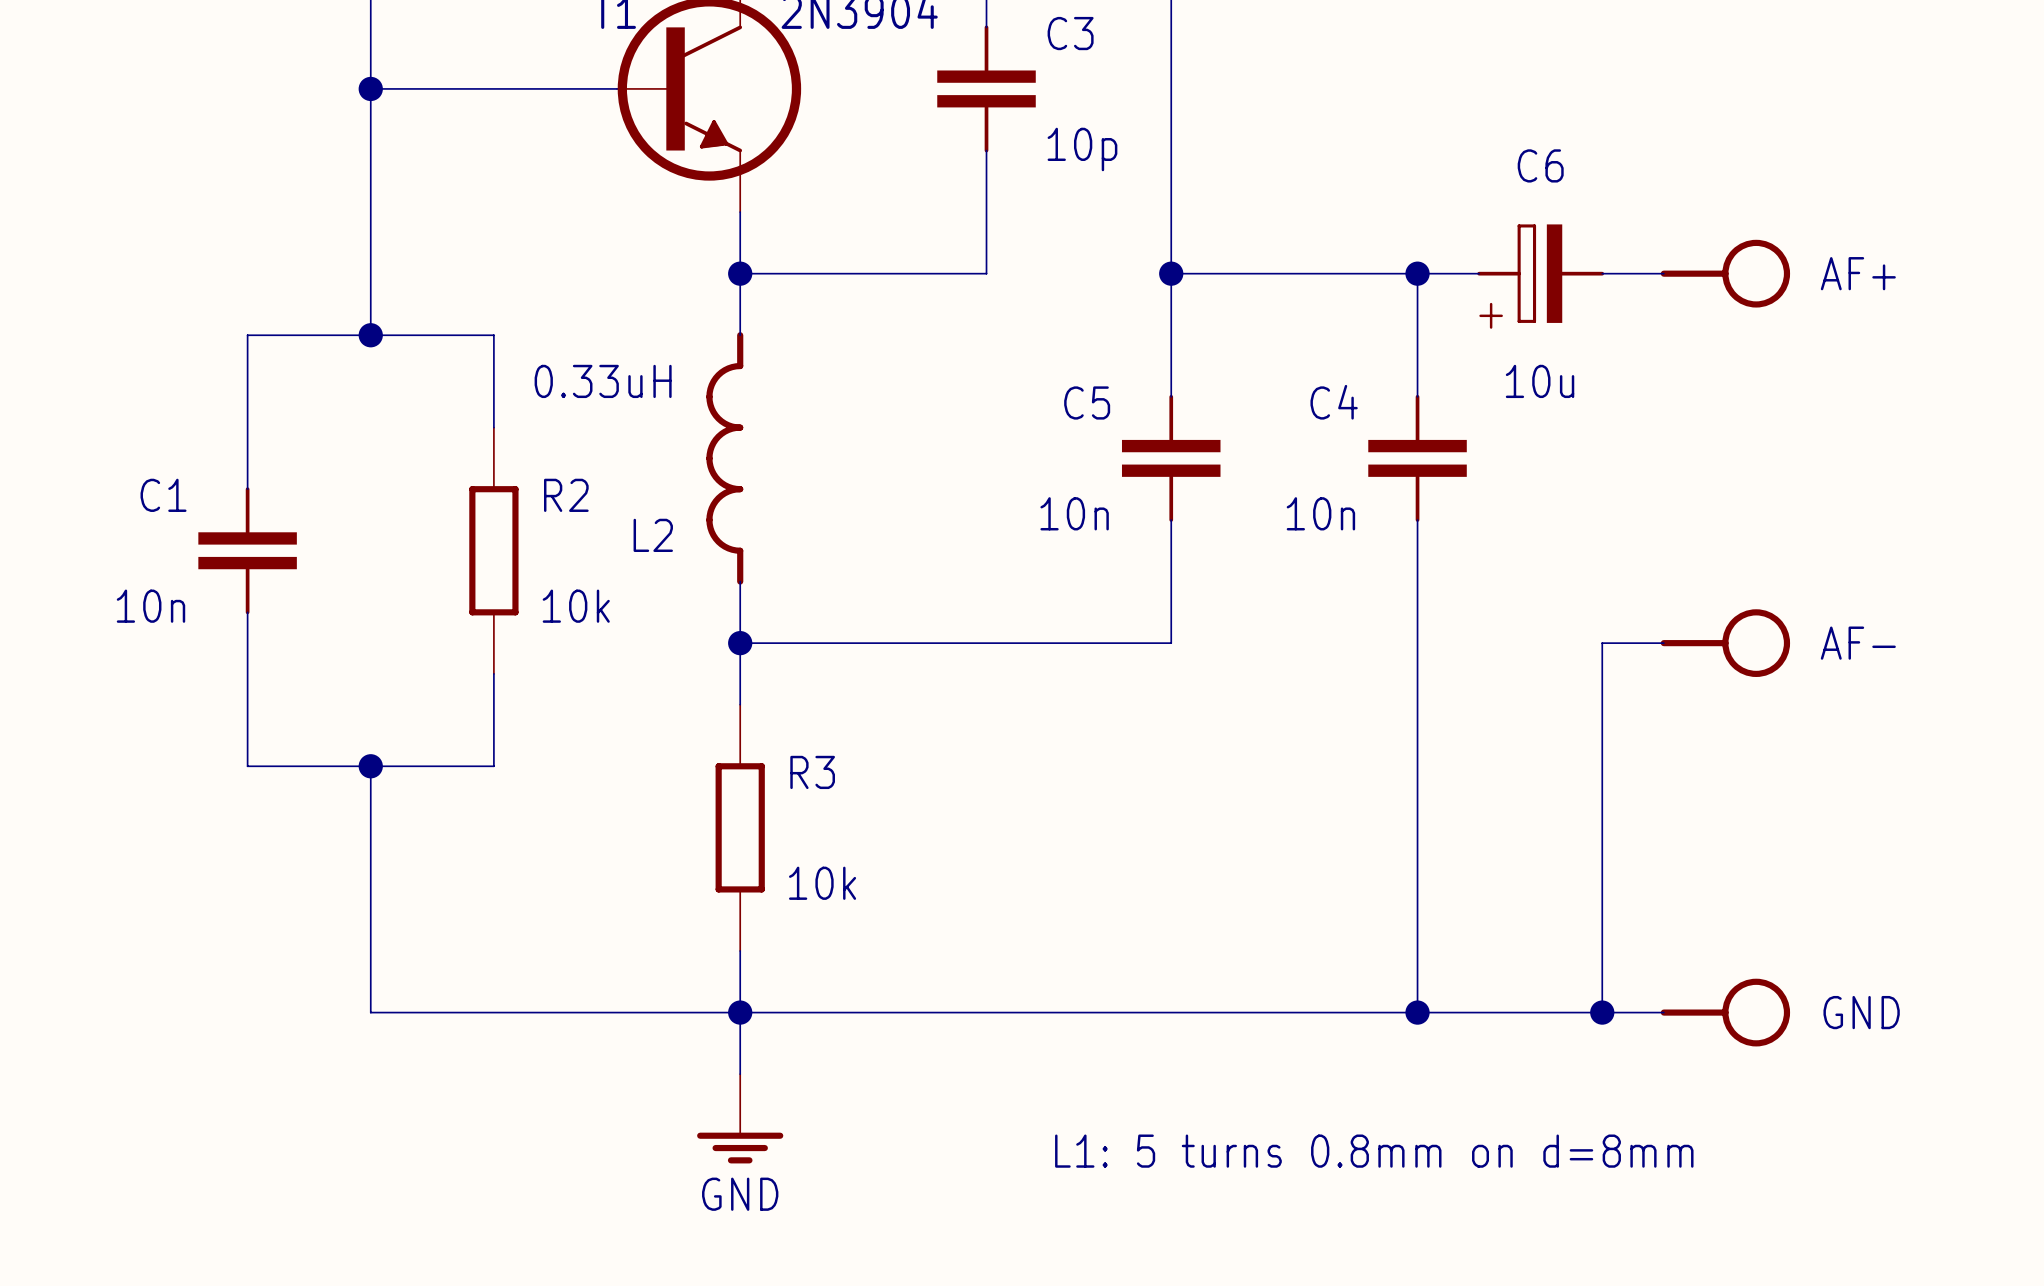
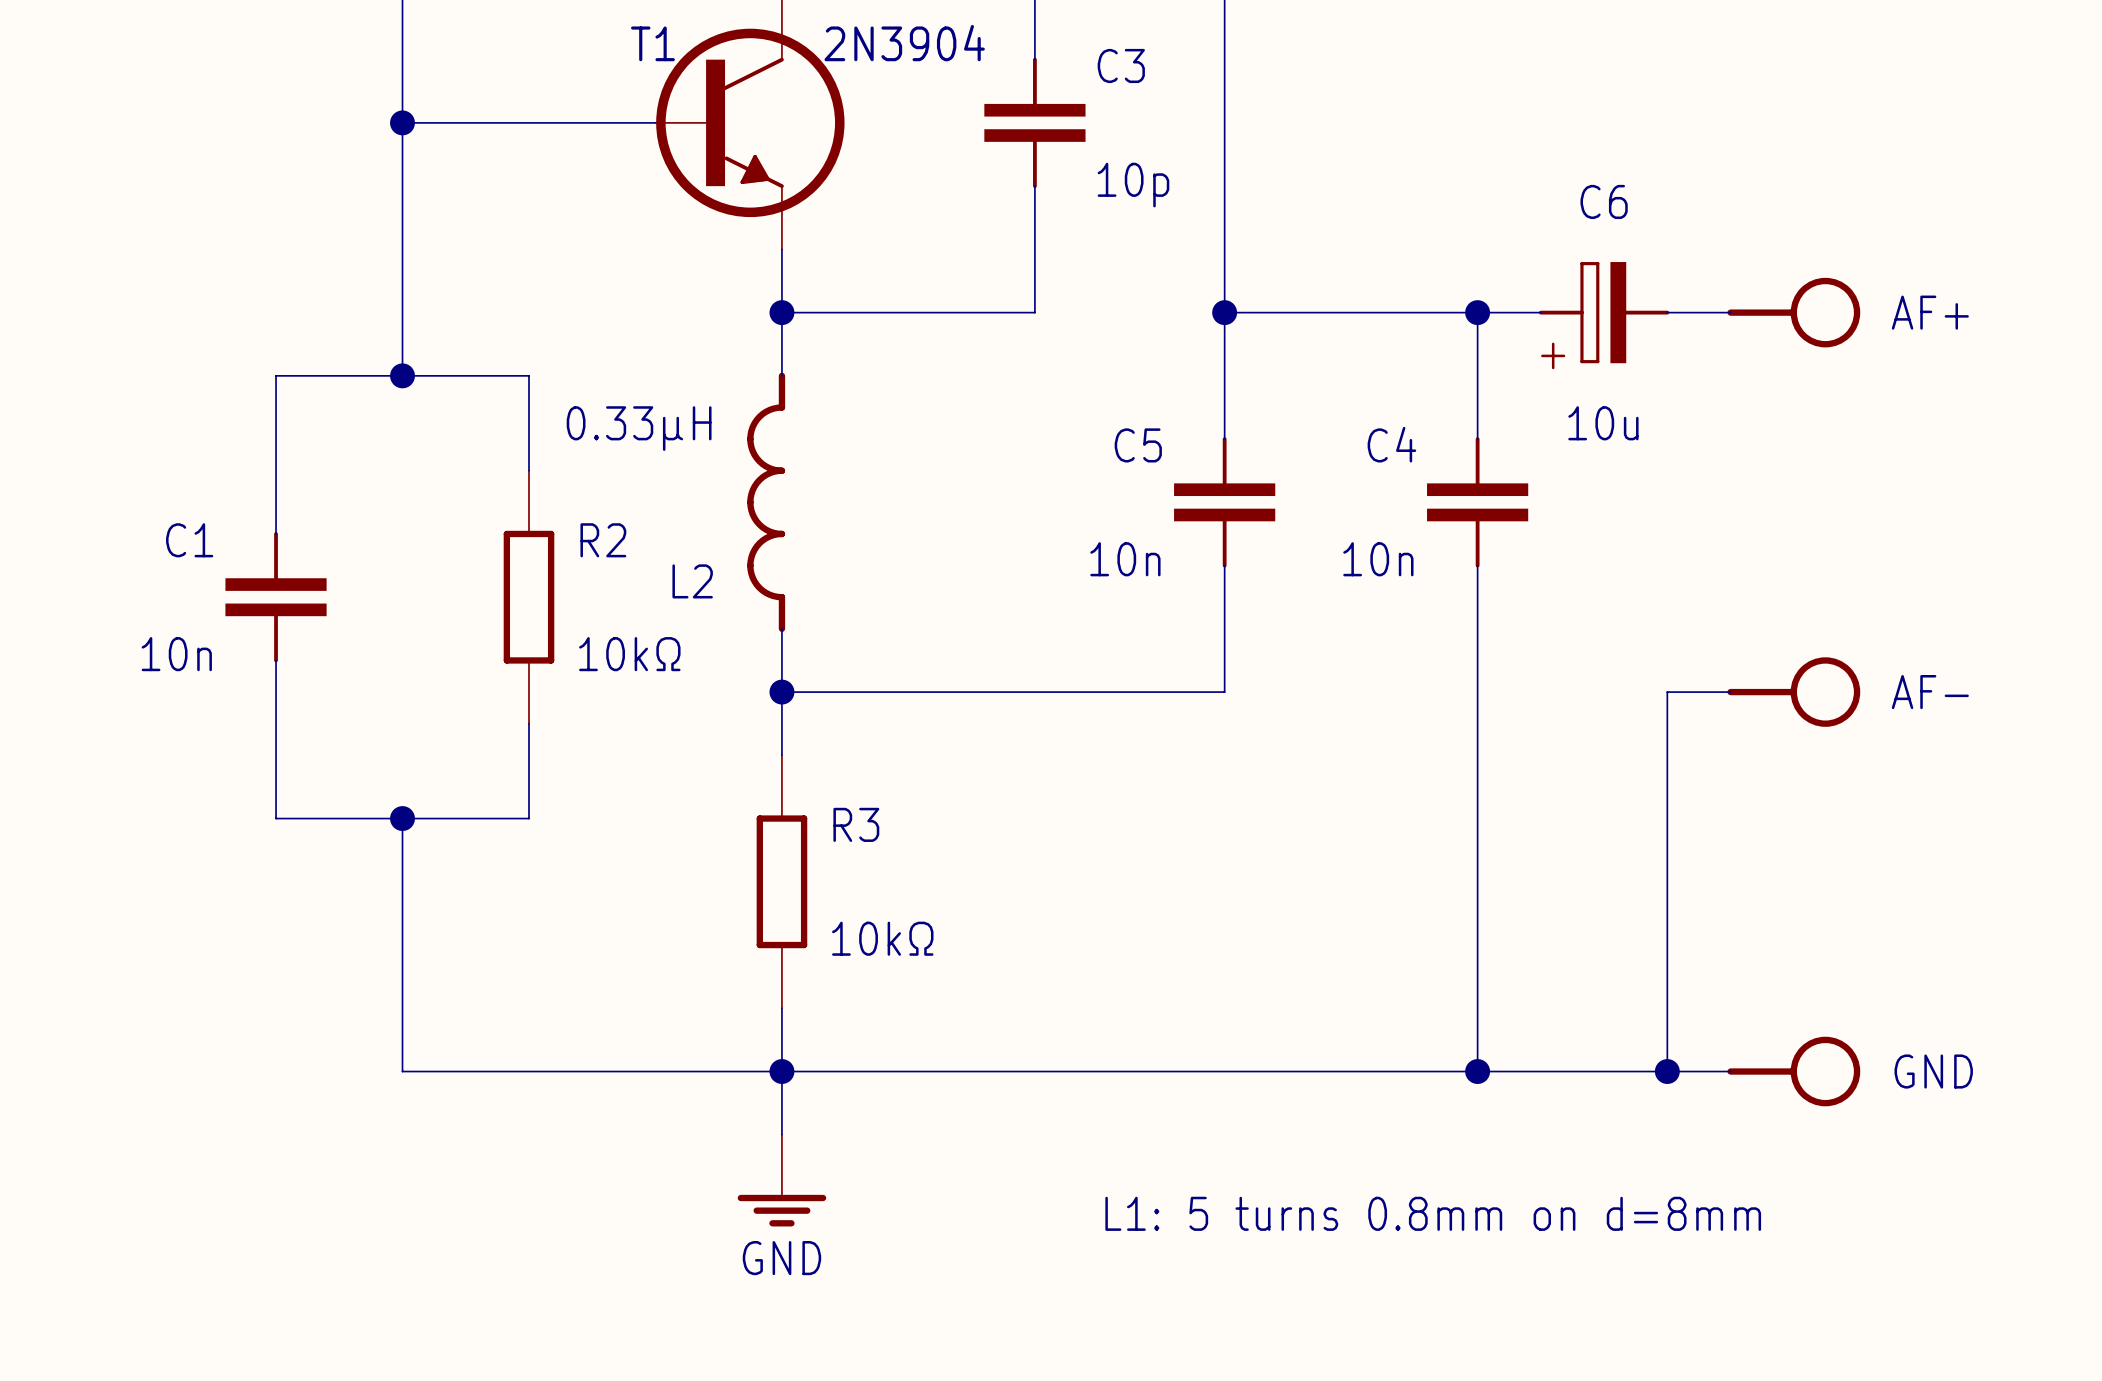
L2 value: 0.33uH (603, 381) -> 0.33μH (639, 428)
R2 value: 10k (576, 606) -> 10kΩ (629, 654)
R3 value: 10k (822, 883) -> 10kΩ (882, 938)

